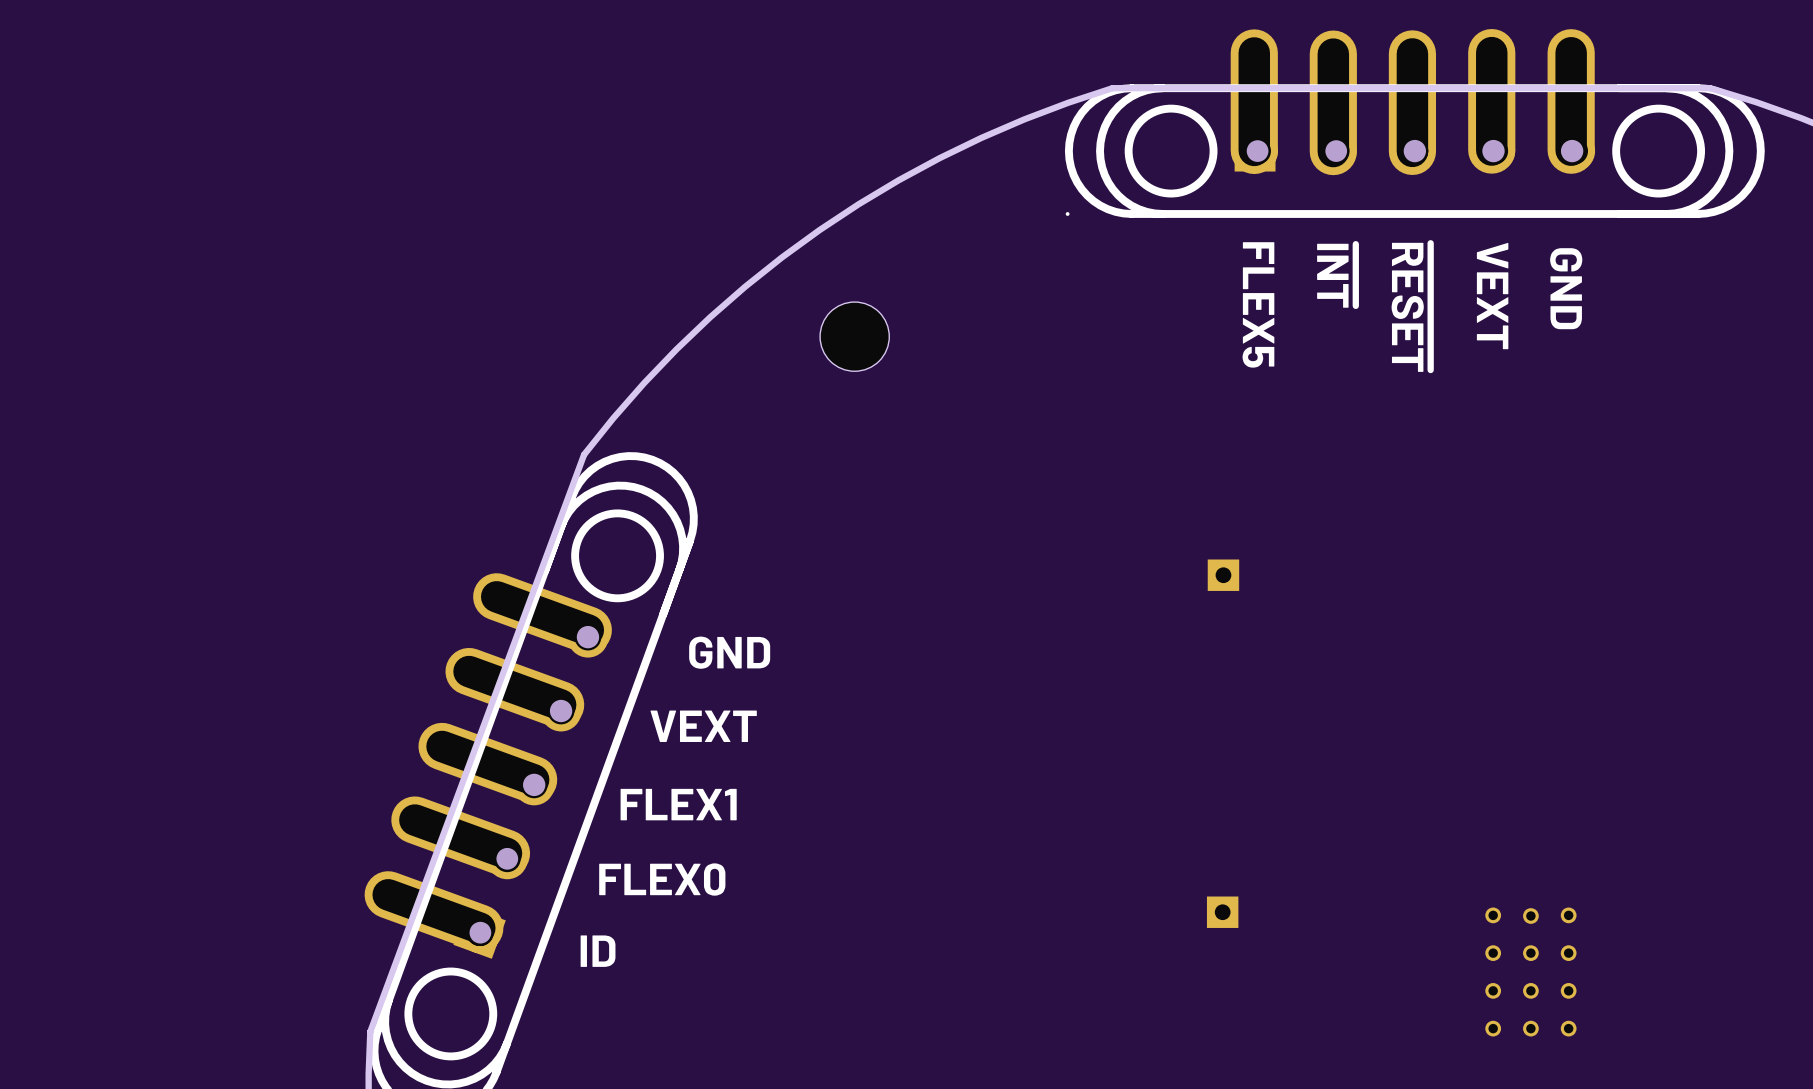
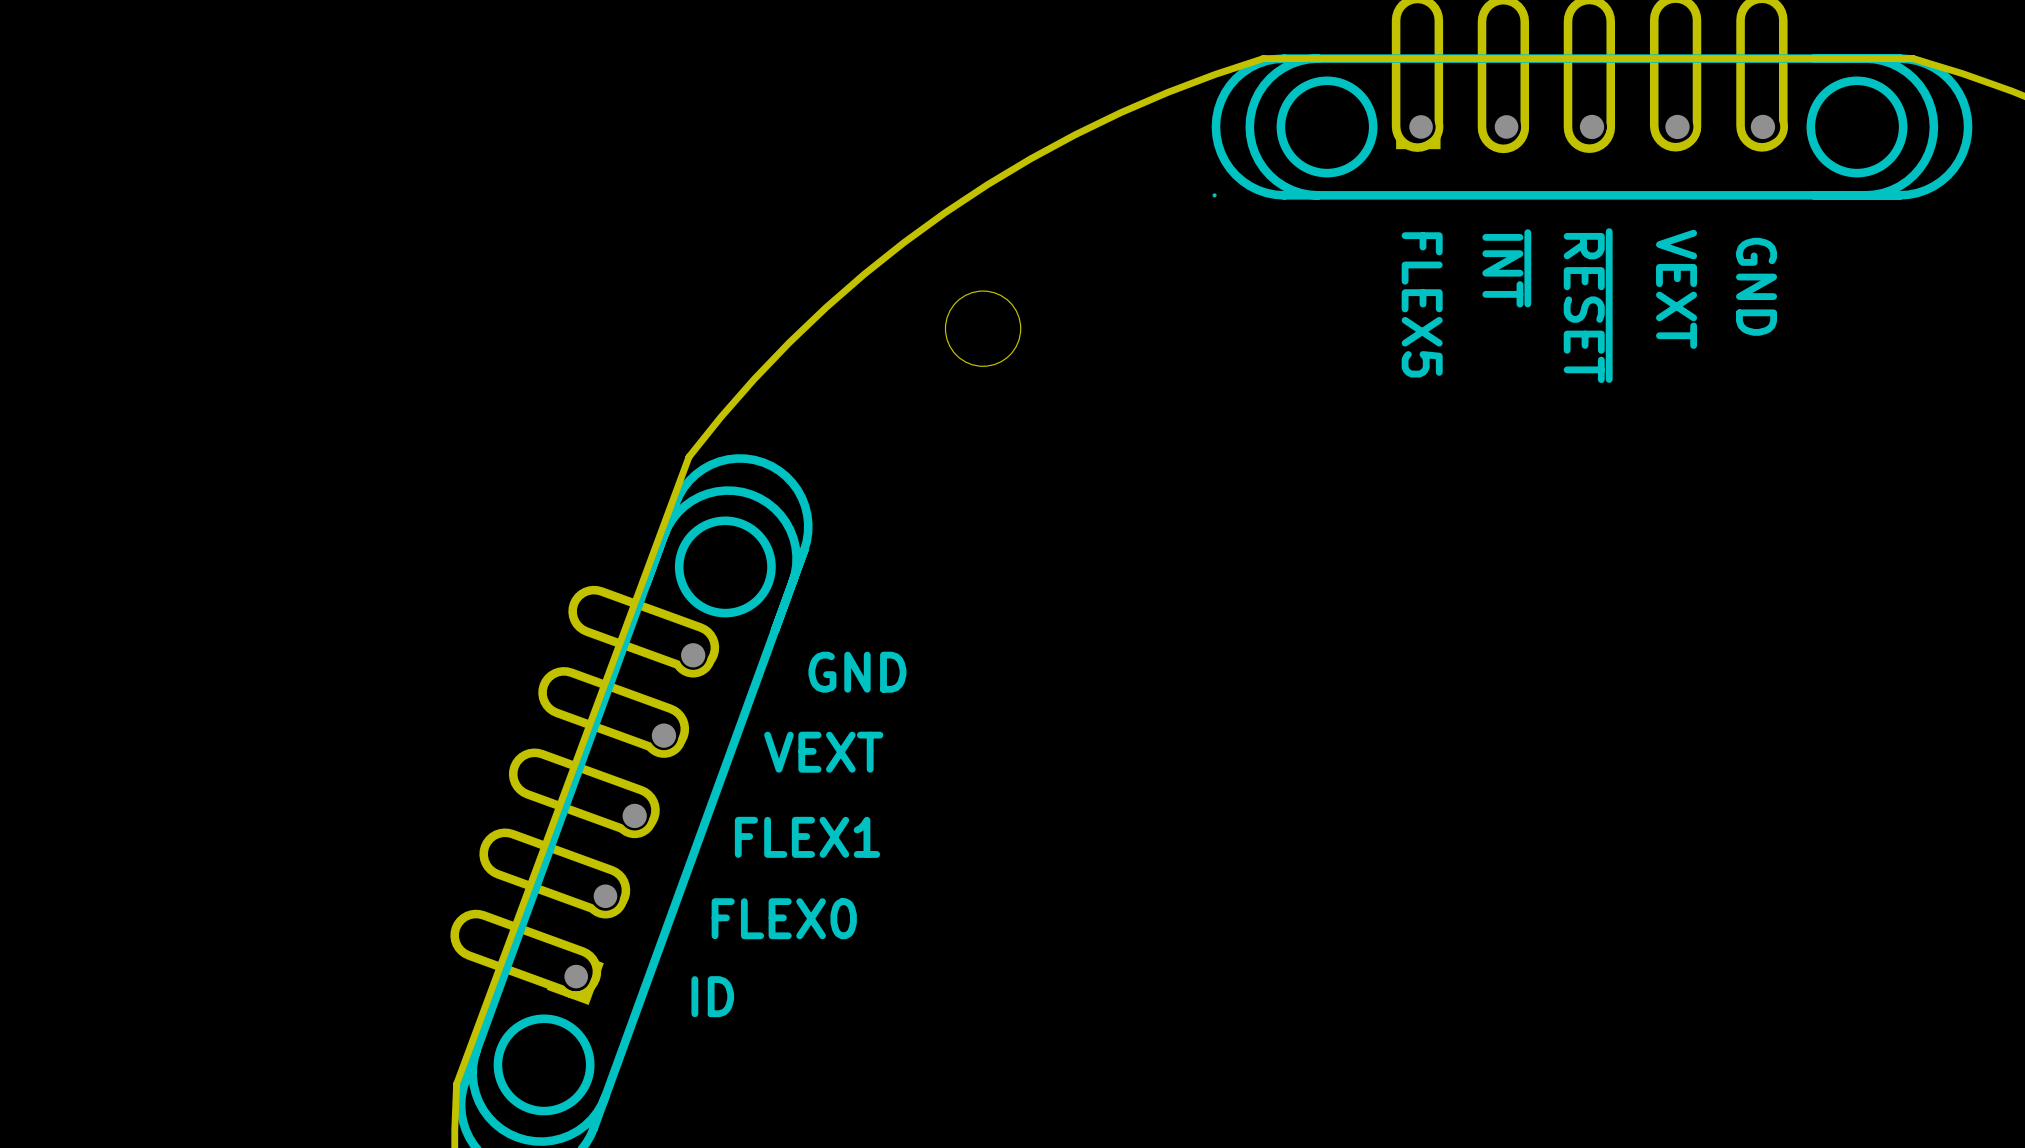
part: (1223, 575) -> none
part: (1222, 912) -> none
part: (1530, 972) -> none

